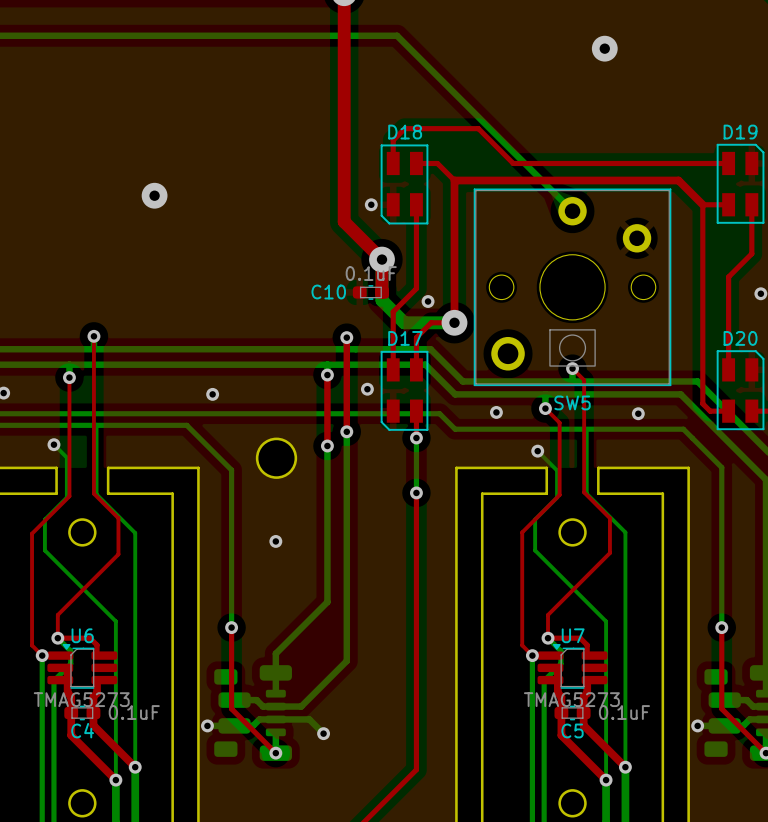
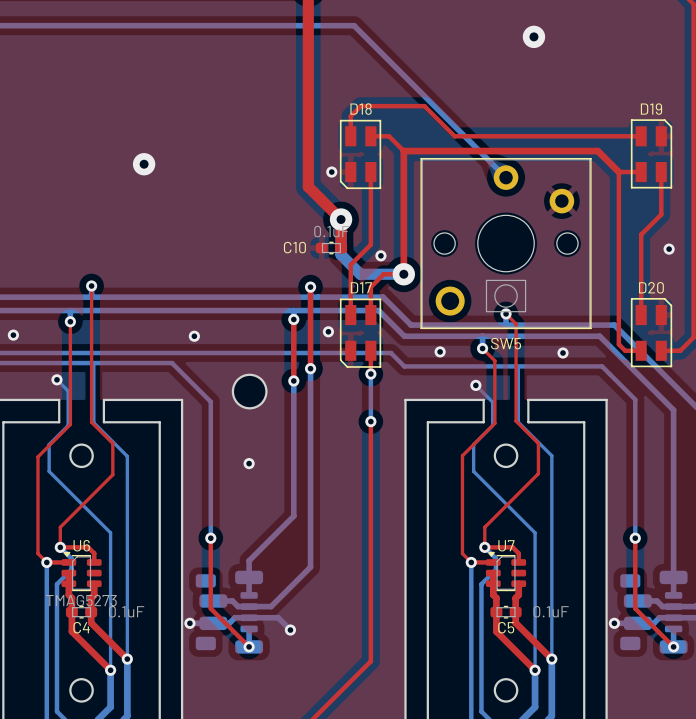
U6 footprint: [47, 643, 118, 689] -> [61, 551, 102, 592]
U7 footprint: [537, 643, 608, 689] -> [485, 551, 527, 592]
U7 value: TMAG5273 (571, 699) -> none

